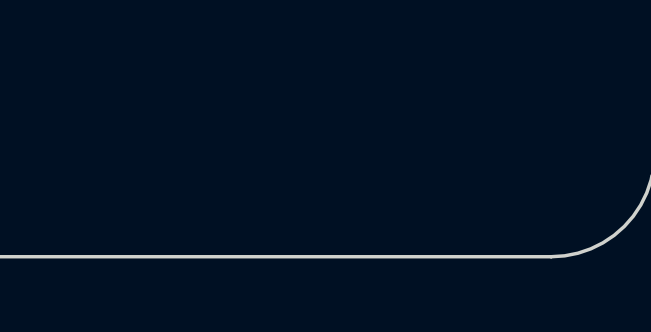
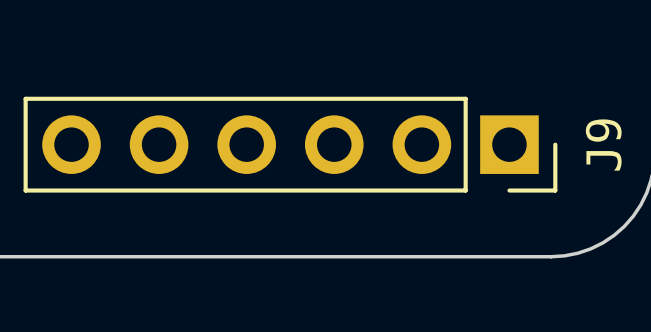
J9: none -> (290, 144)

